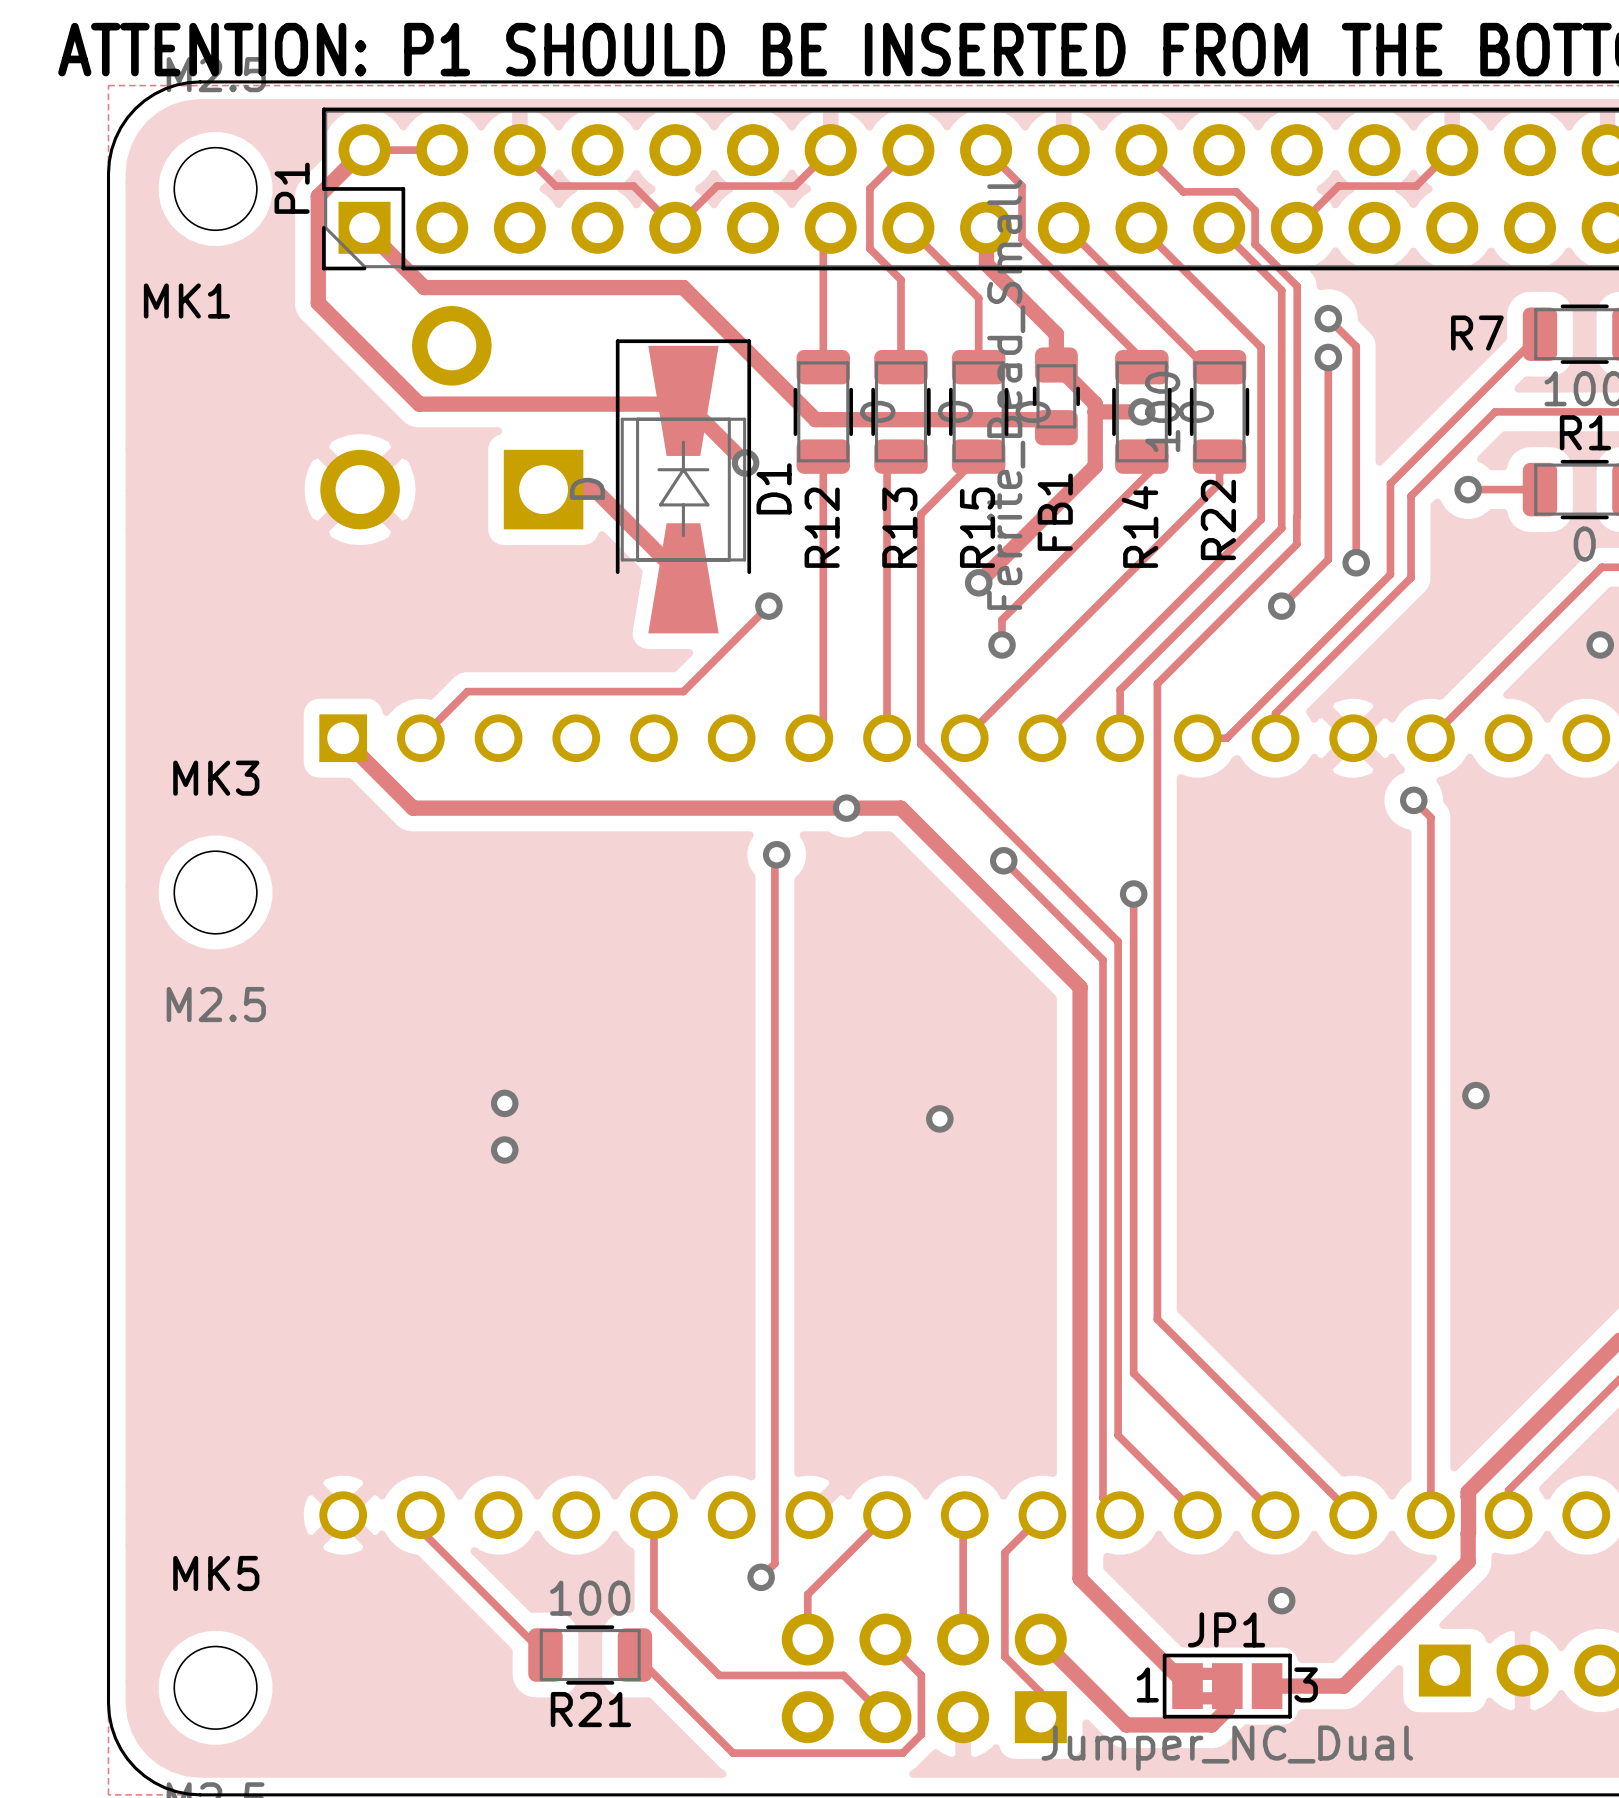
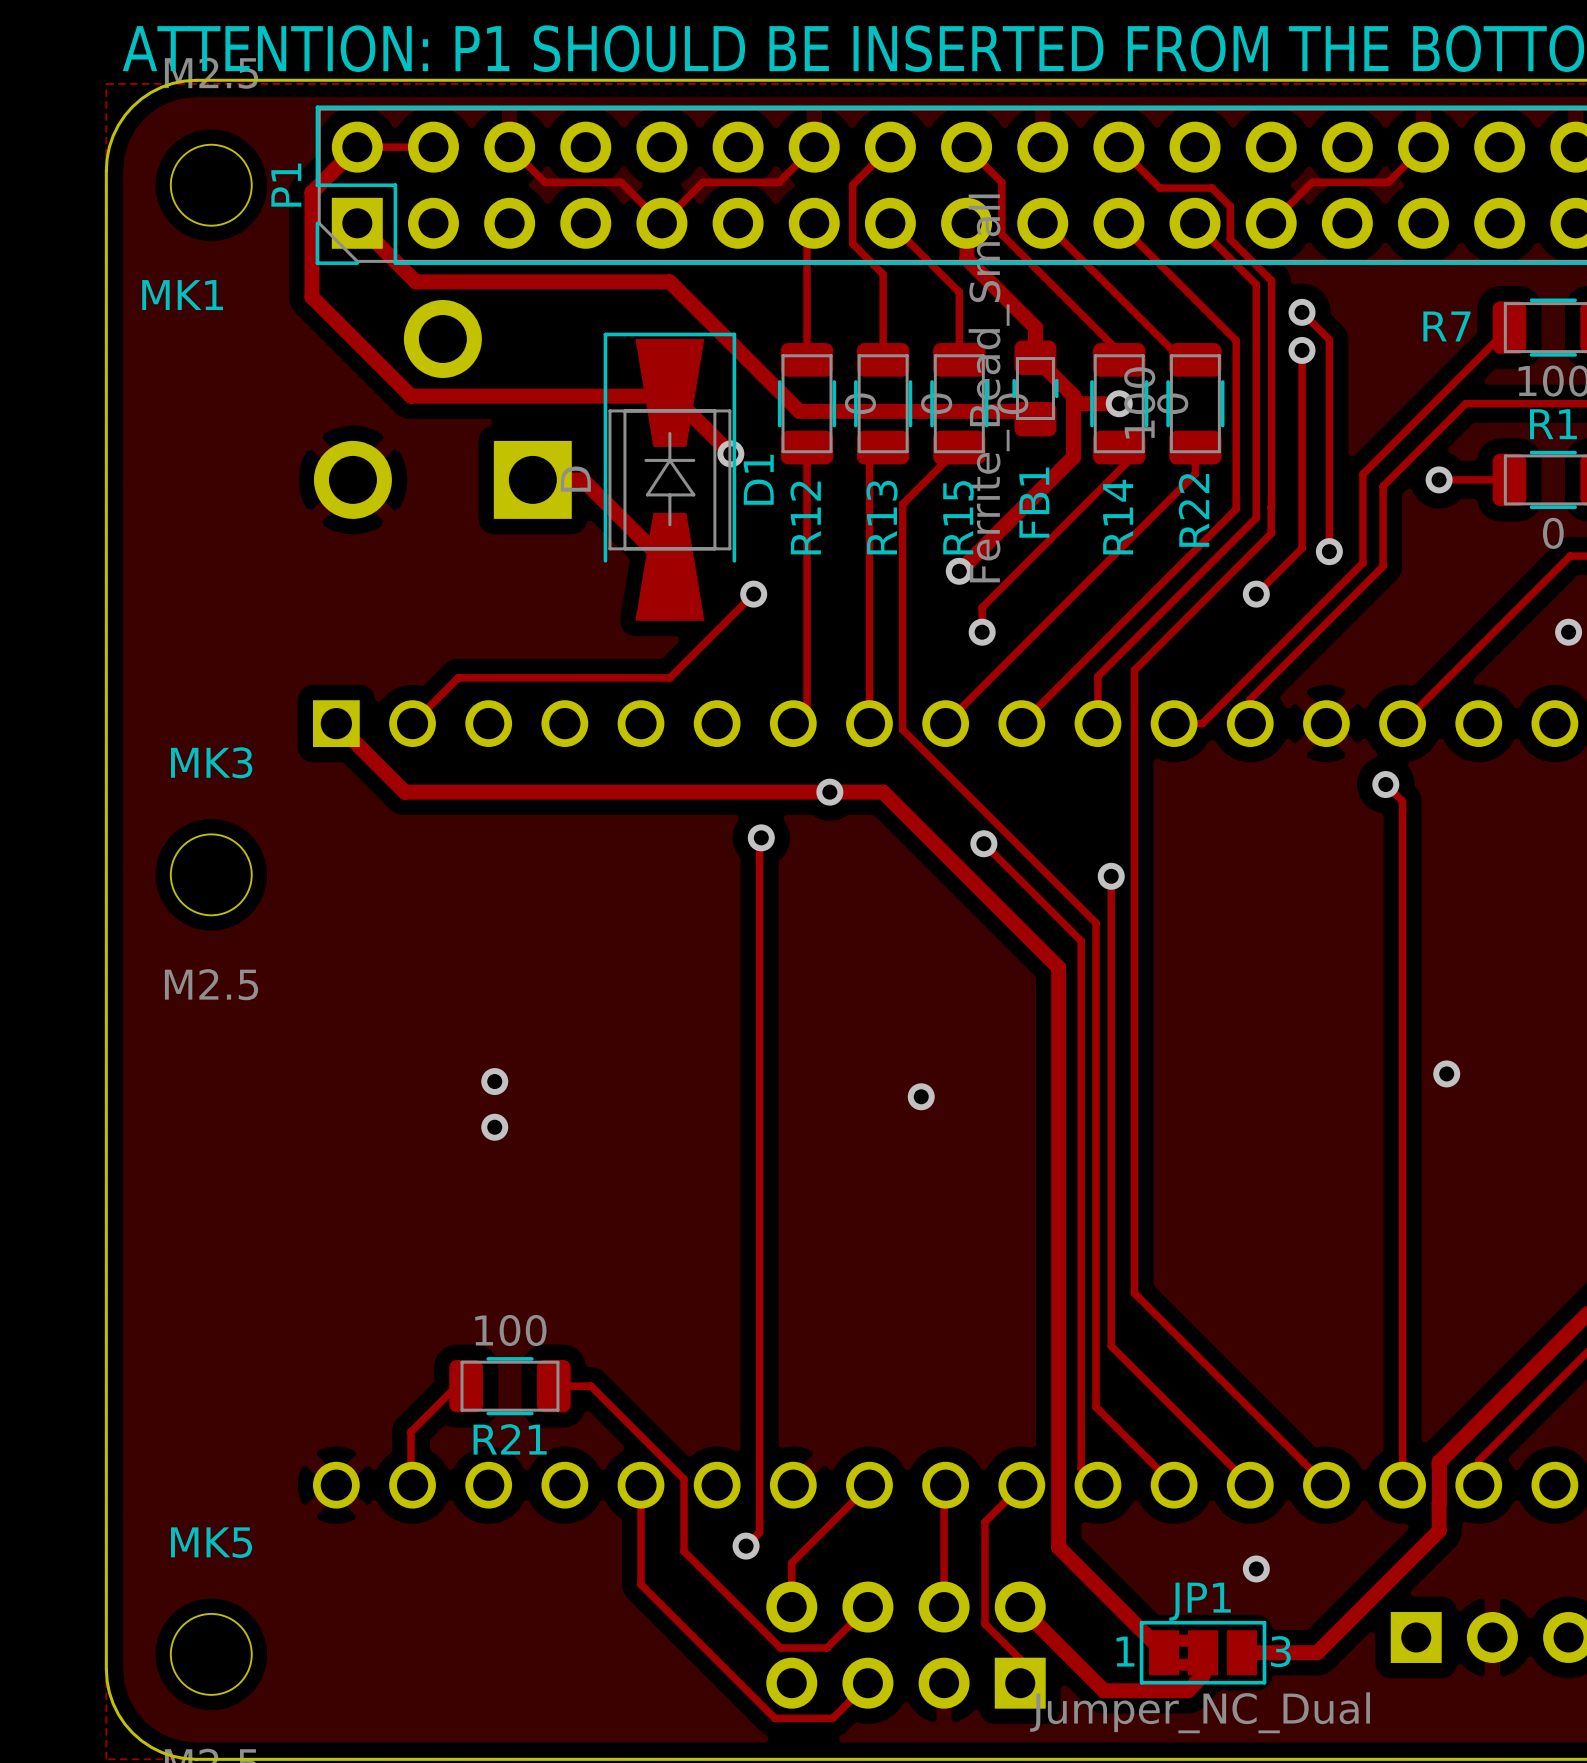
track: none -> (553, 1386) (591, 1386) (684, 1479) (684, 1551) (780, 1647) (827, 1647) (867, 1607)
track: (420, 1515) (420, 1530) (545, 1655) -> (412, 1485) (410, 1483) (410, 1431) (456, 1386) (466, 1386)
track: (653, 1609) (719, 1675) (843, 1675) (885, 1717) -> none
track: (885, 1639) (921, 1675) (921, 1734) (902, 1753) (849, 1753) -> (867, 1683) (832, 1718)
R21 position: (590, 1655) -> (509, 1386)
track: (634, 1655) (733, 1753) (790, 1753) -> (641, 1578) (641, 1584) (774, 1718)

